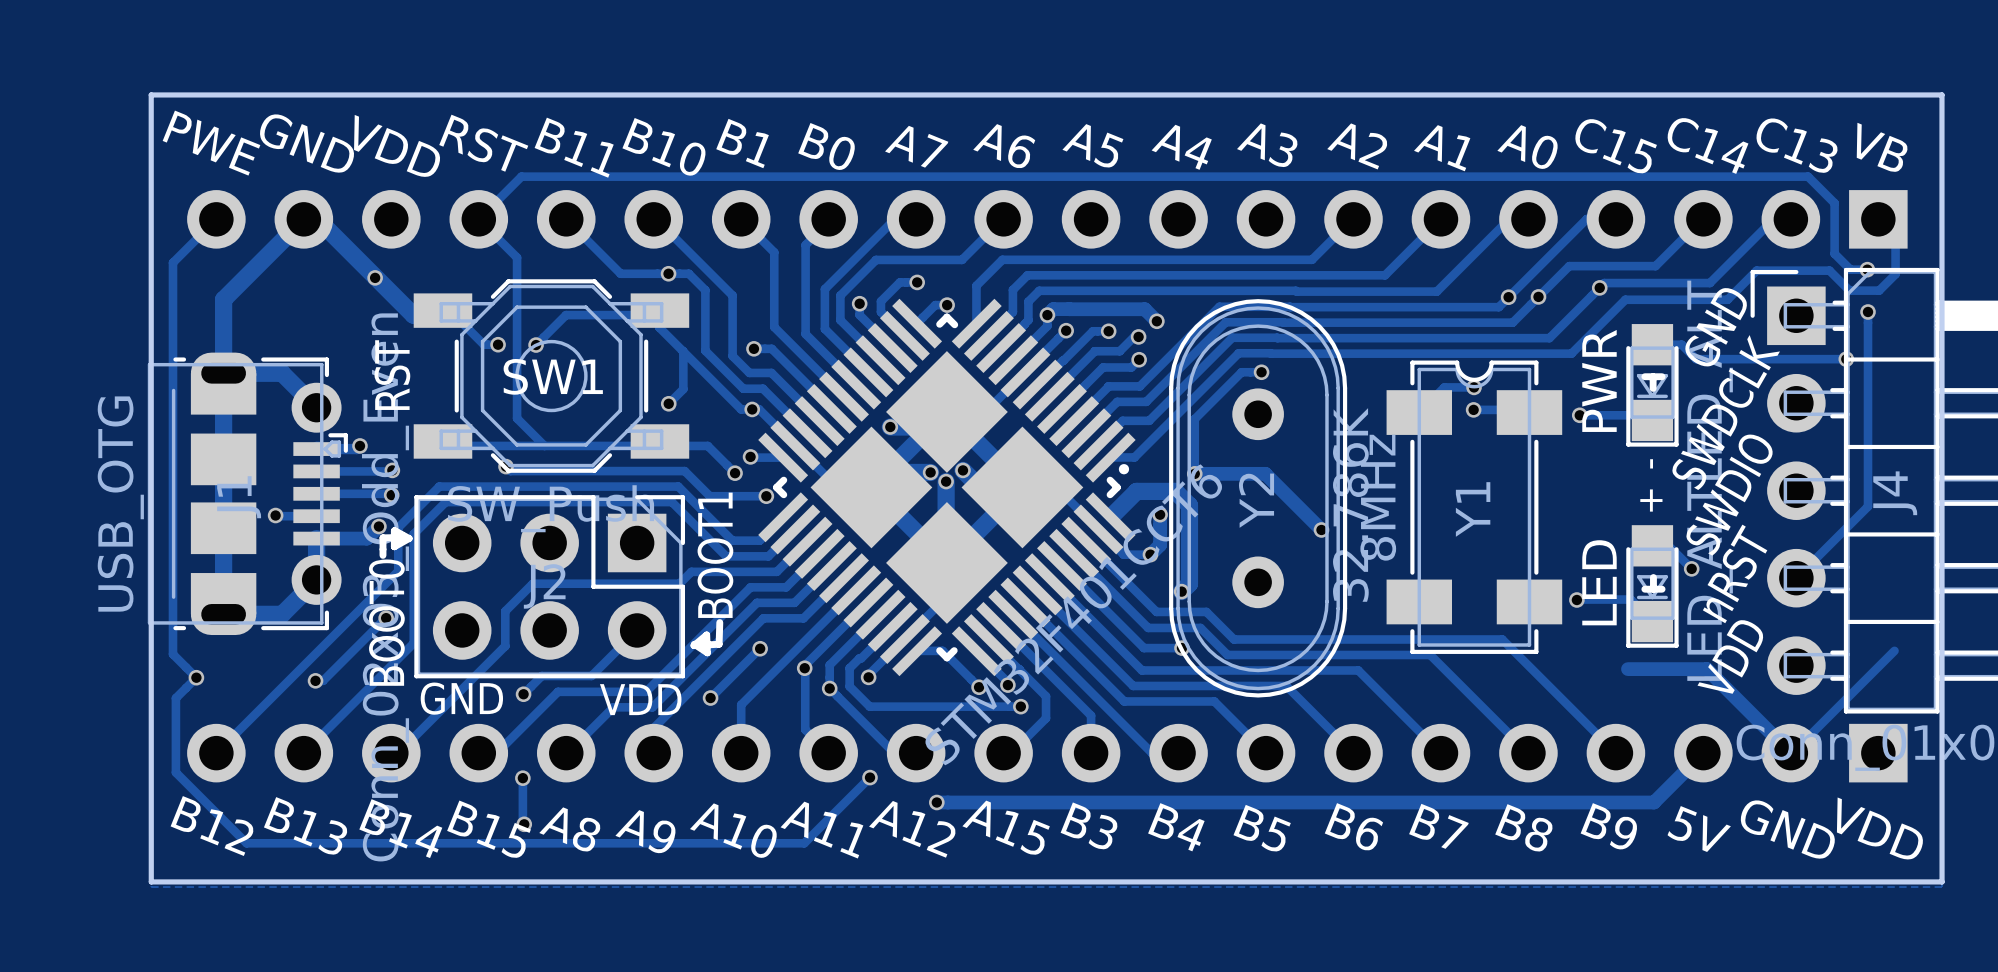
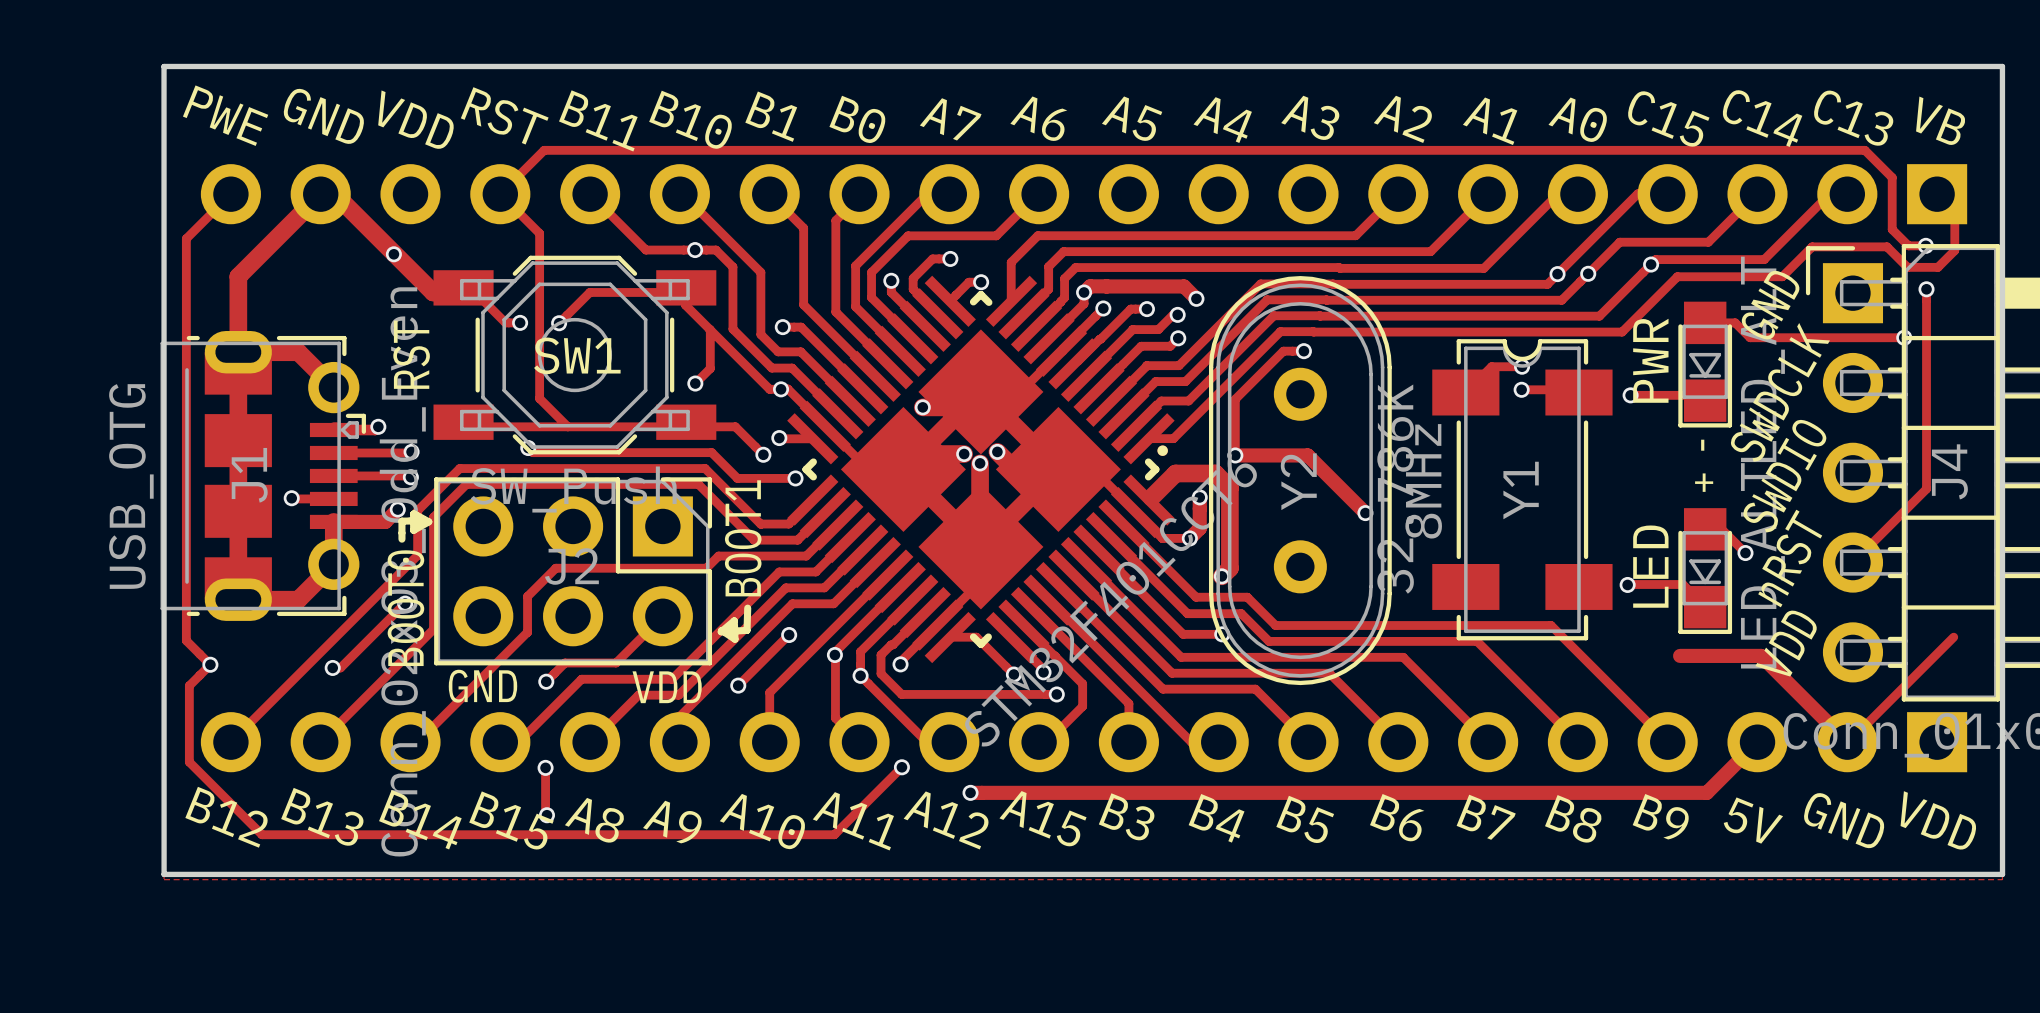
line: (1644, 376) (1662, 376) -> none
line: (1653, 376) (1653, 388) -> none
line: (1653, 577) (1653, 589) -> none
line: (1644, 589) (1662, 589) -> none

